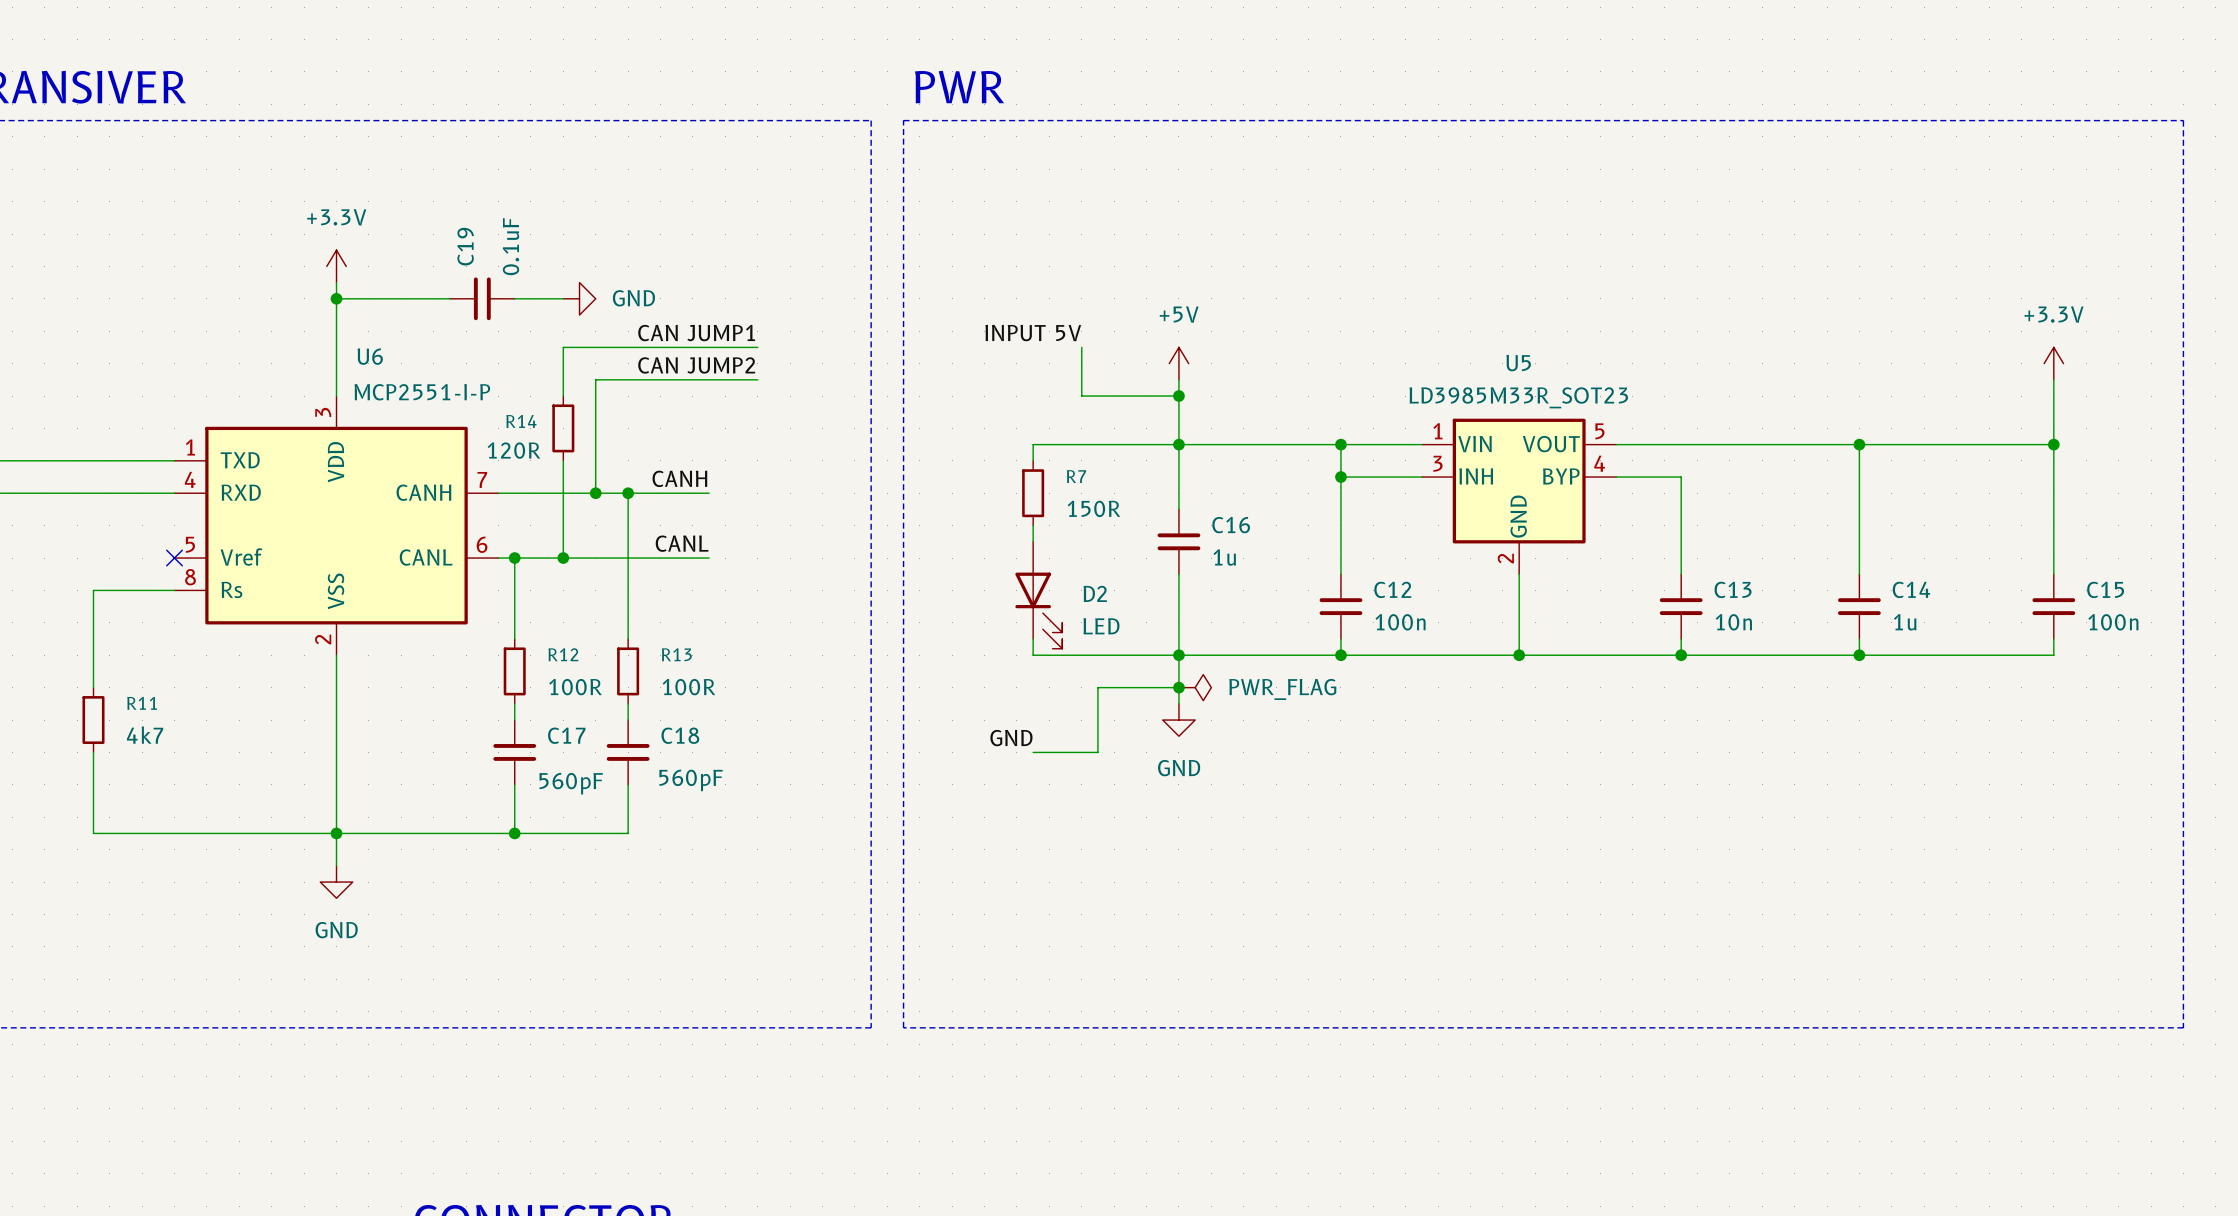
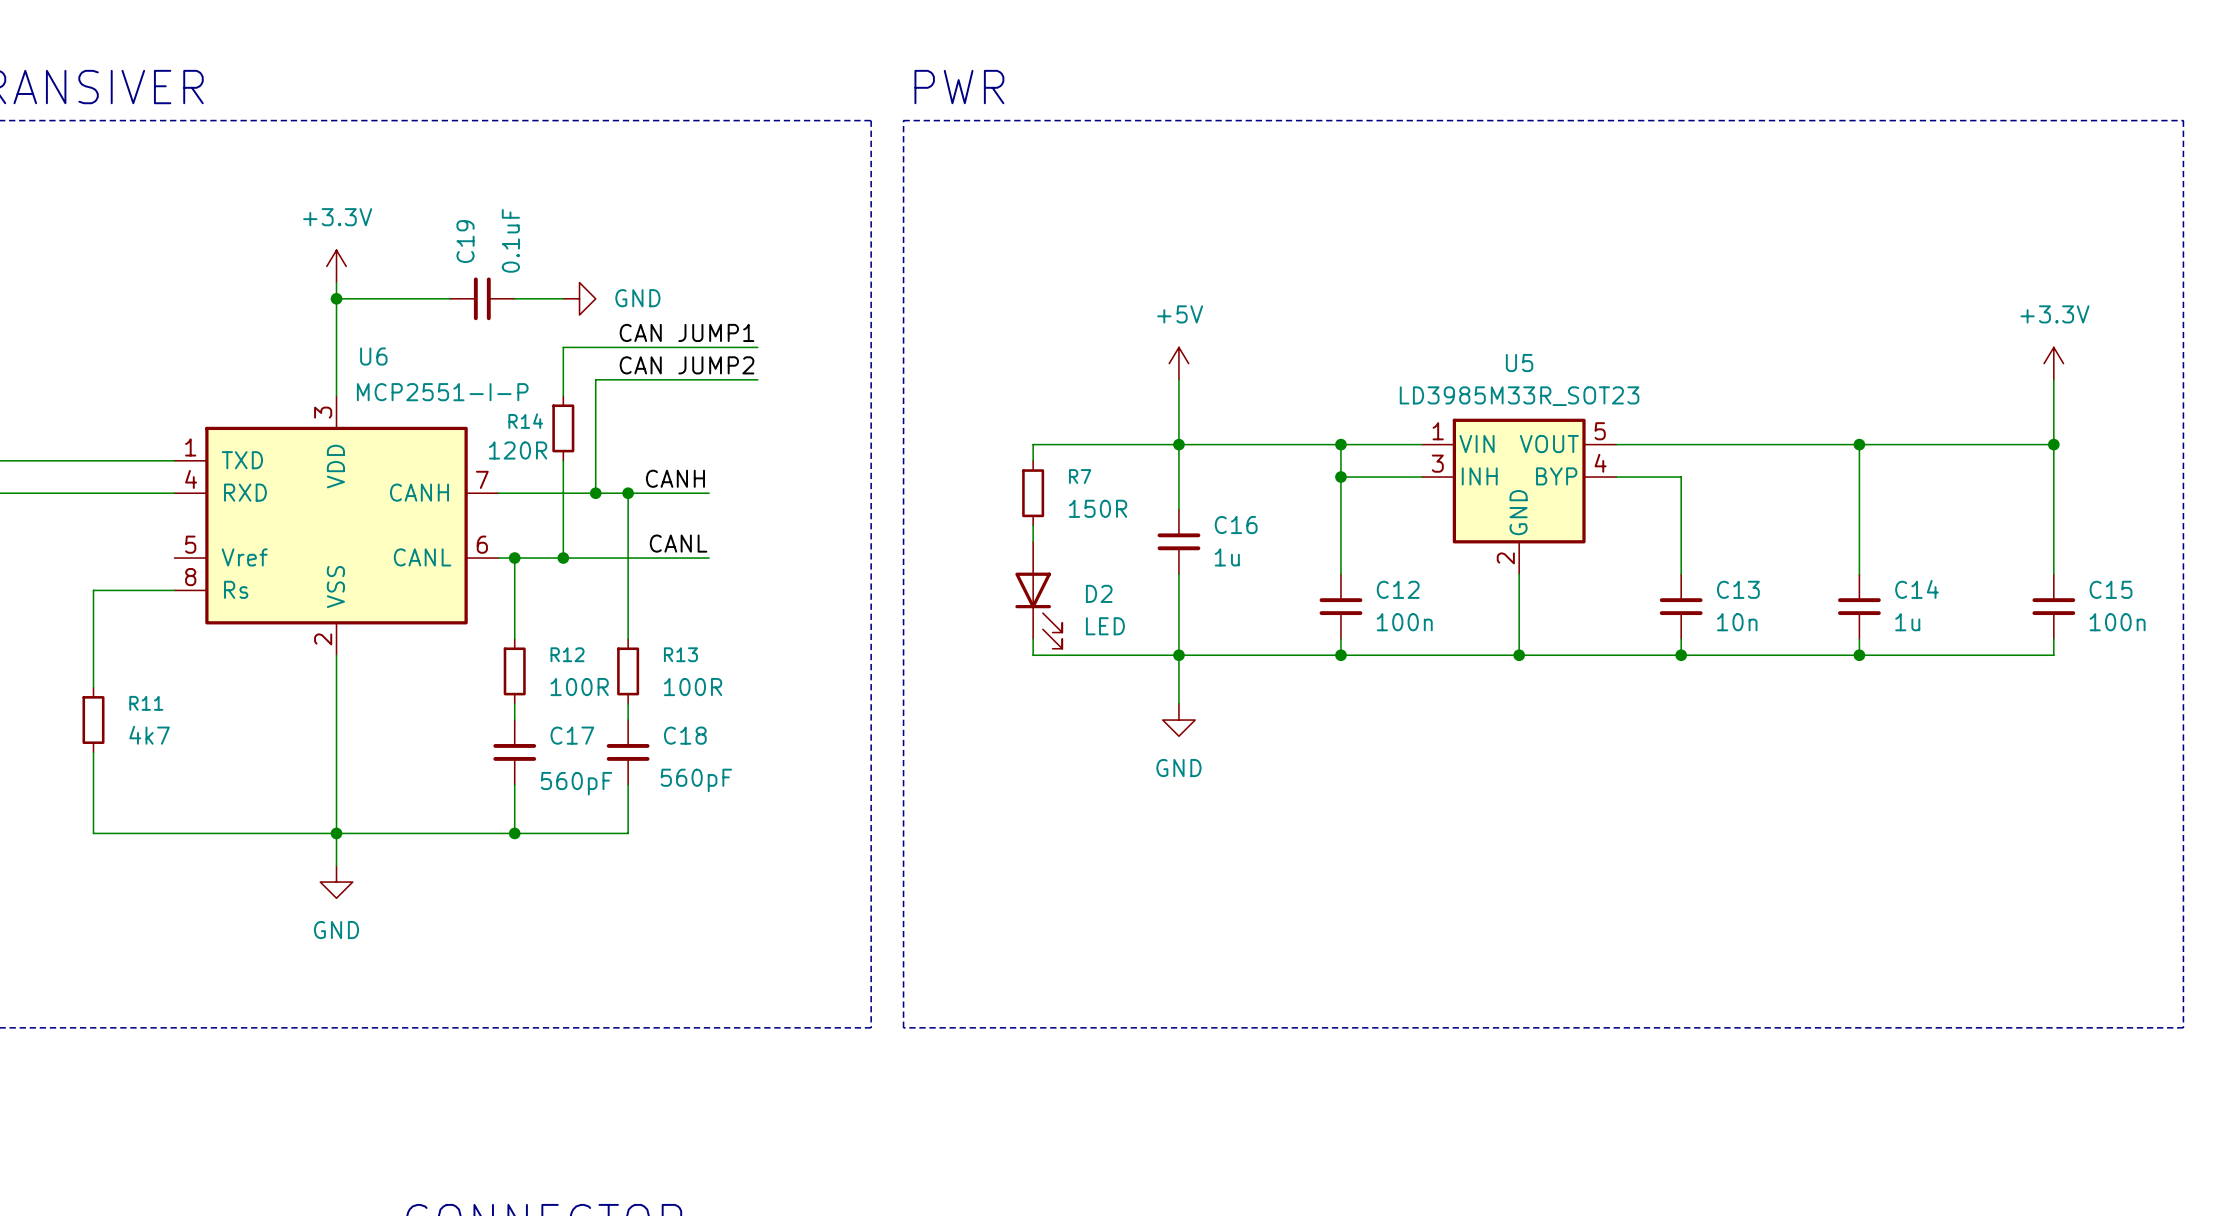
label: INPUT 5V (1033, 333) -> none
wire: (1081, 347) (1081, 396) (1178, 396) -> none
junction: (1178, 396) -> none
no-connect mark: (174, 558) -> none
wire: (1178, 687) (1097, 687) (1097, 752) (1033, 752) -> none
junction: (1178, 687) -> none
power symbol: PWR_FLAG (1195, 687) -> none
label: GND (1011, 738) -> none

